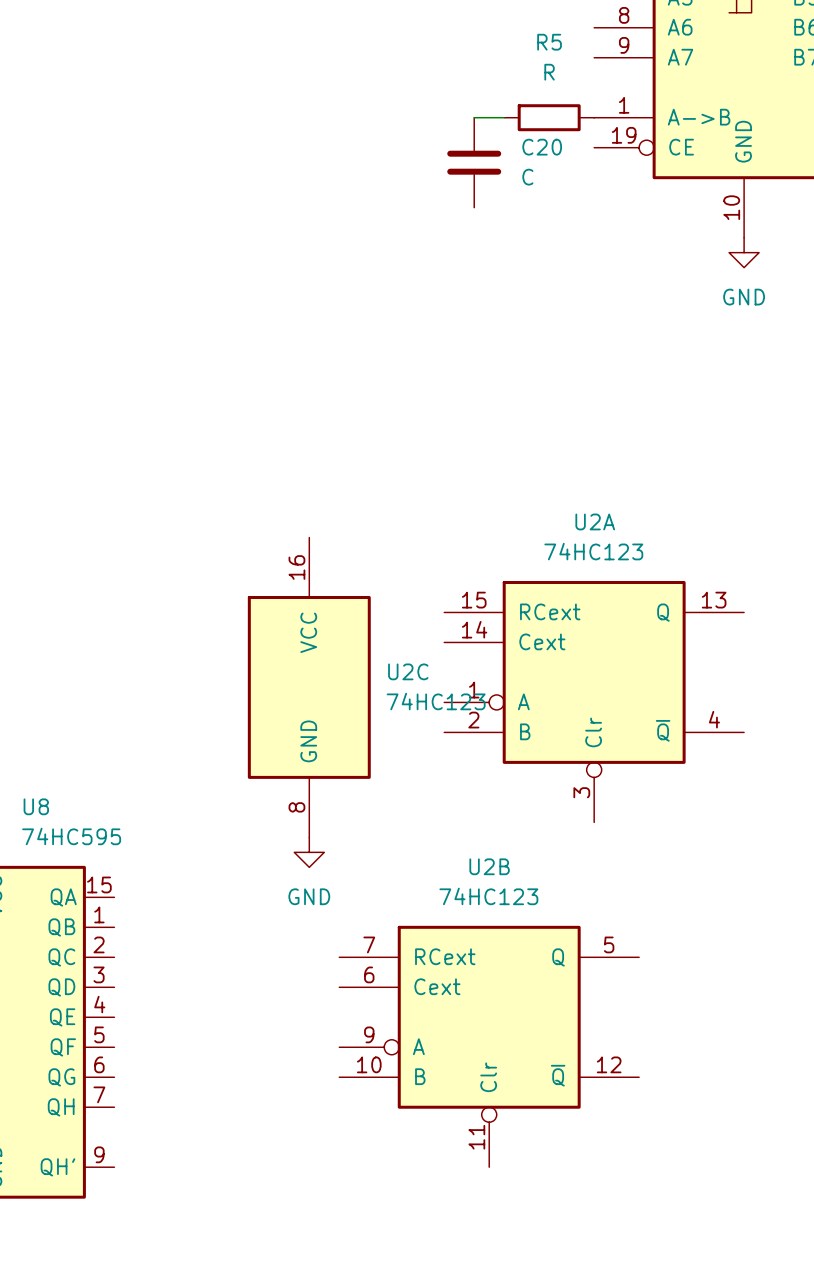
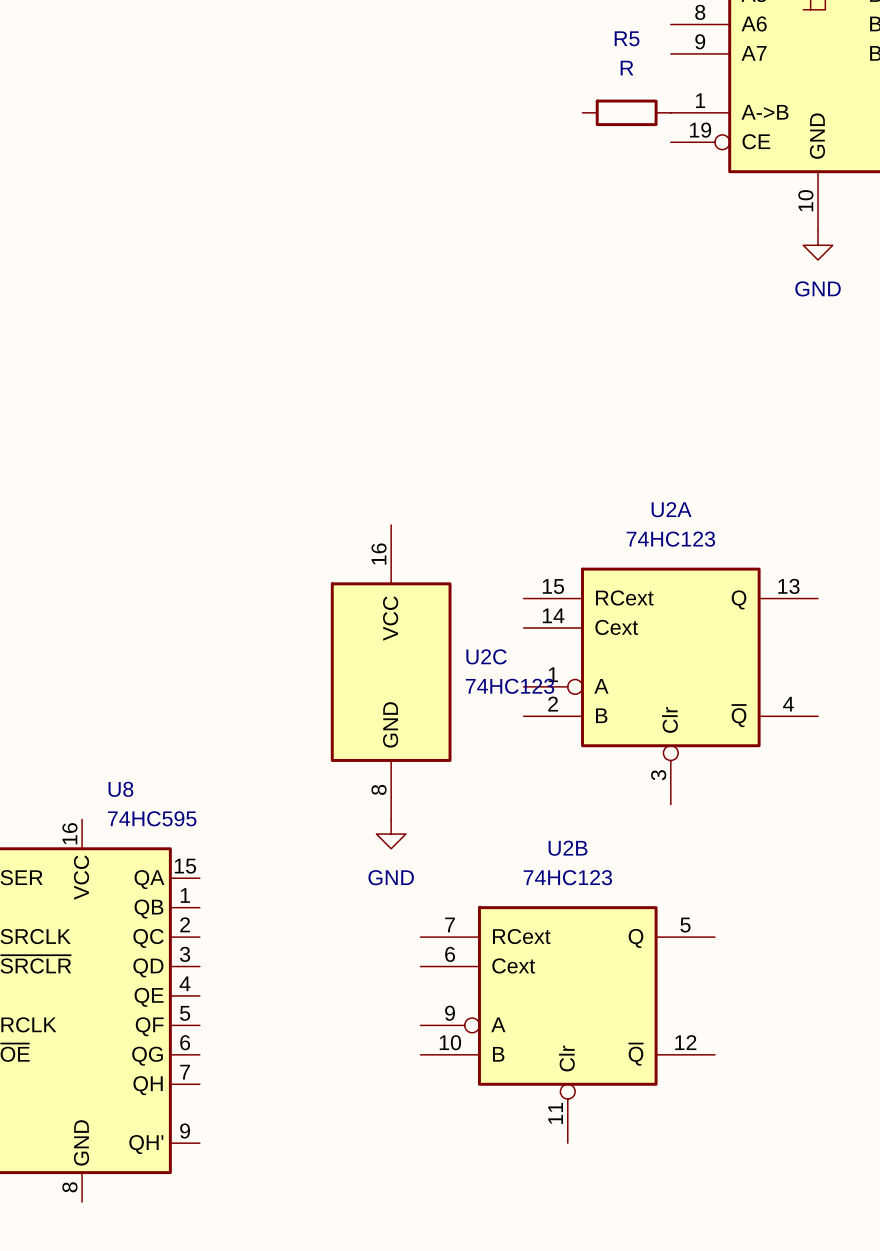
wire: (474, 117) (504, 117) -> none
C20: C (474, 162) -> none

